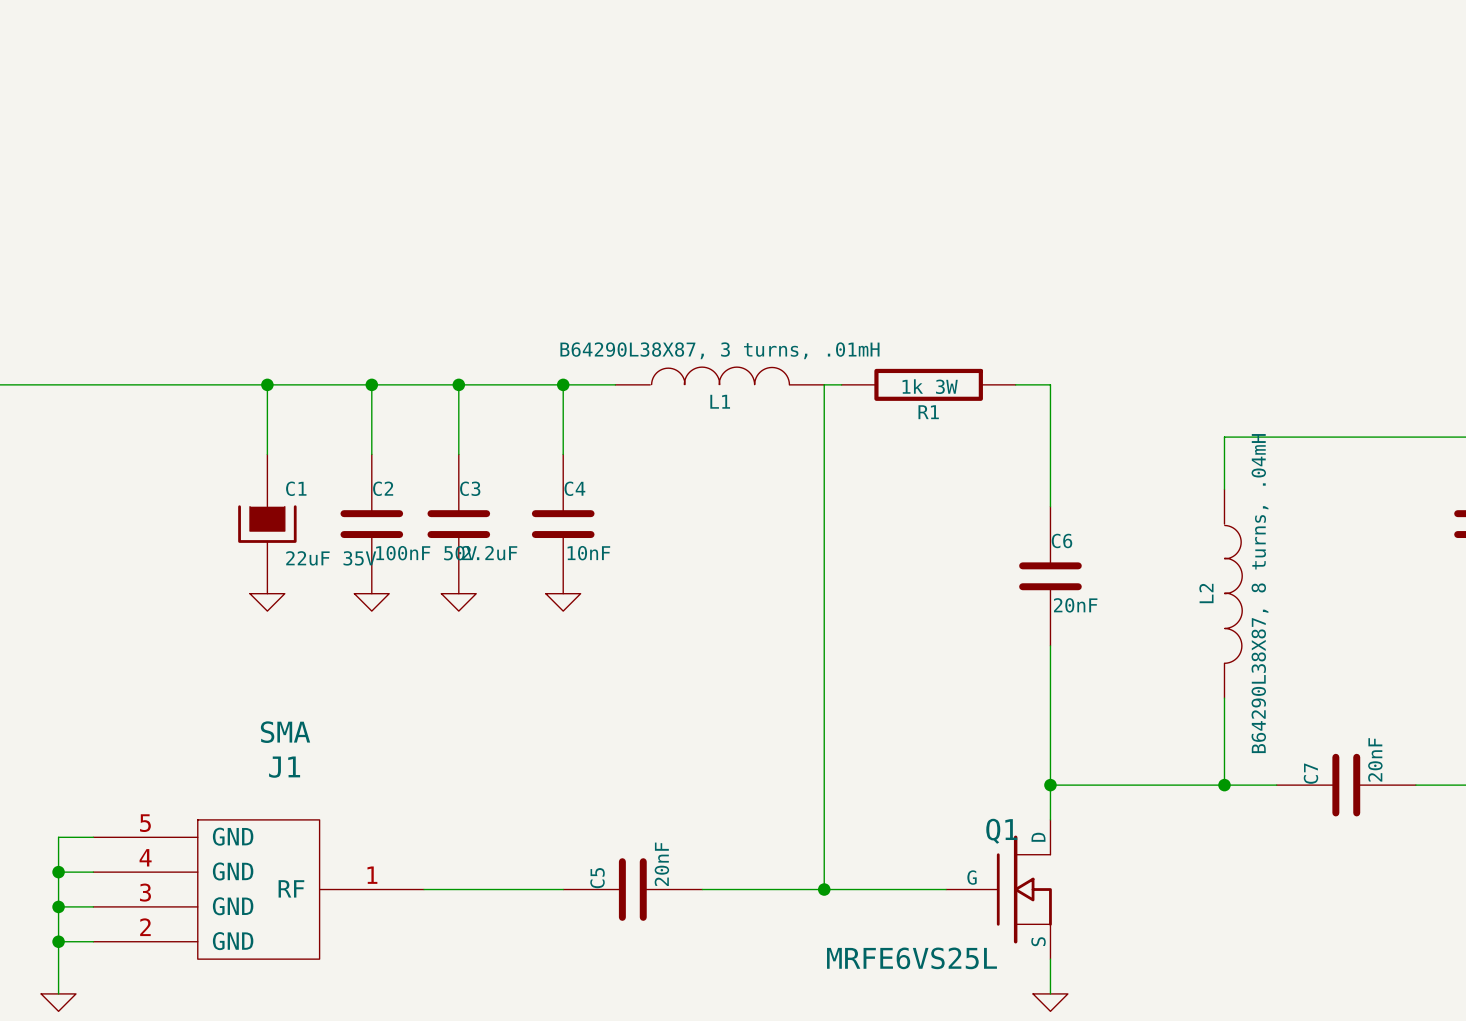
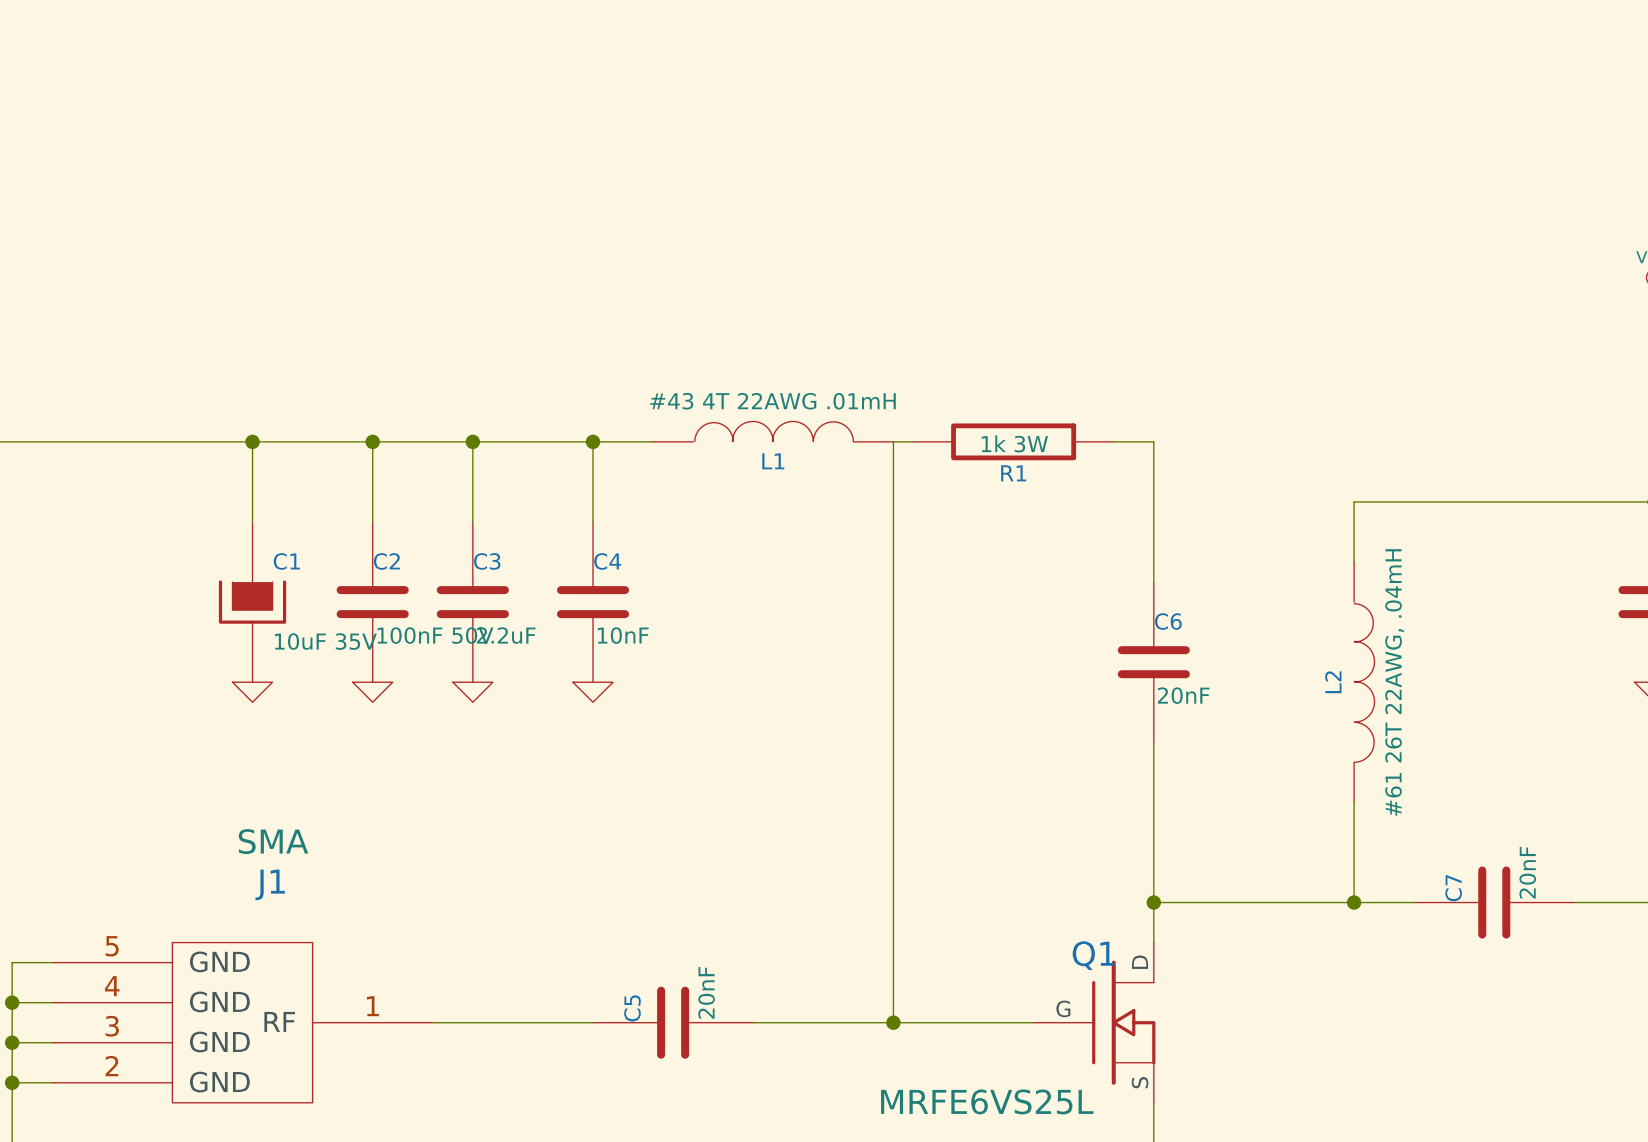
L1 value: B64290L38X87, 3 turns, .01mH (719, 350) -> #43 4T 22AWG .01mH (773, 401)
C1 value: 22uF 35V (331, 558) -> 10uF 35V (325, 641)
L2 value: B64290L38X87, 8 turns, .04mH (1259, 593) -> #61 26T 22AWG, .04mH (1394, 682)

